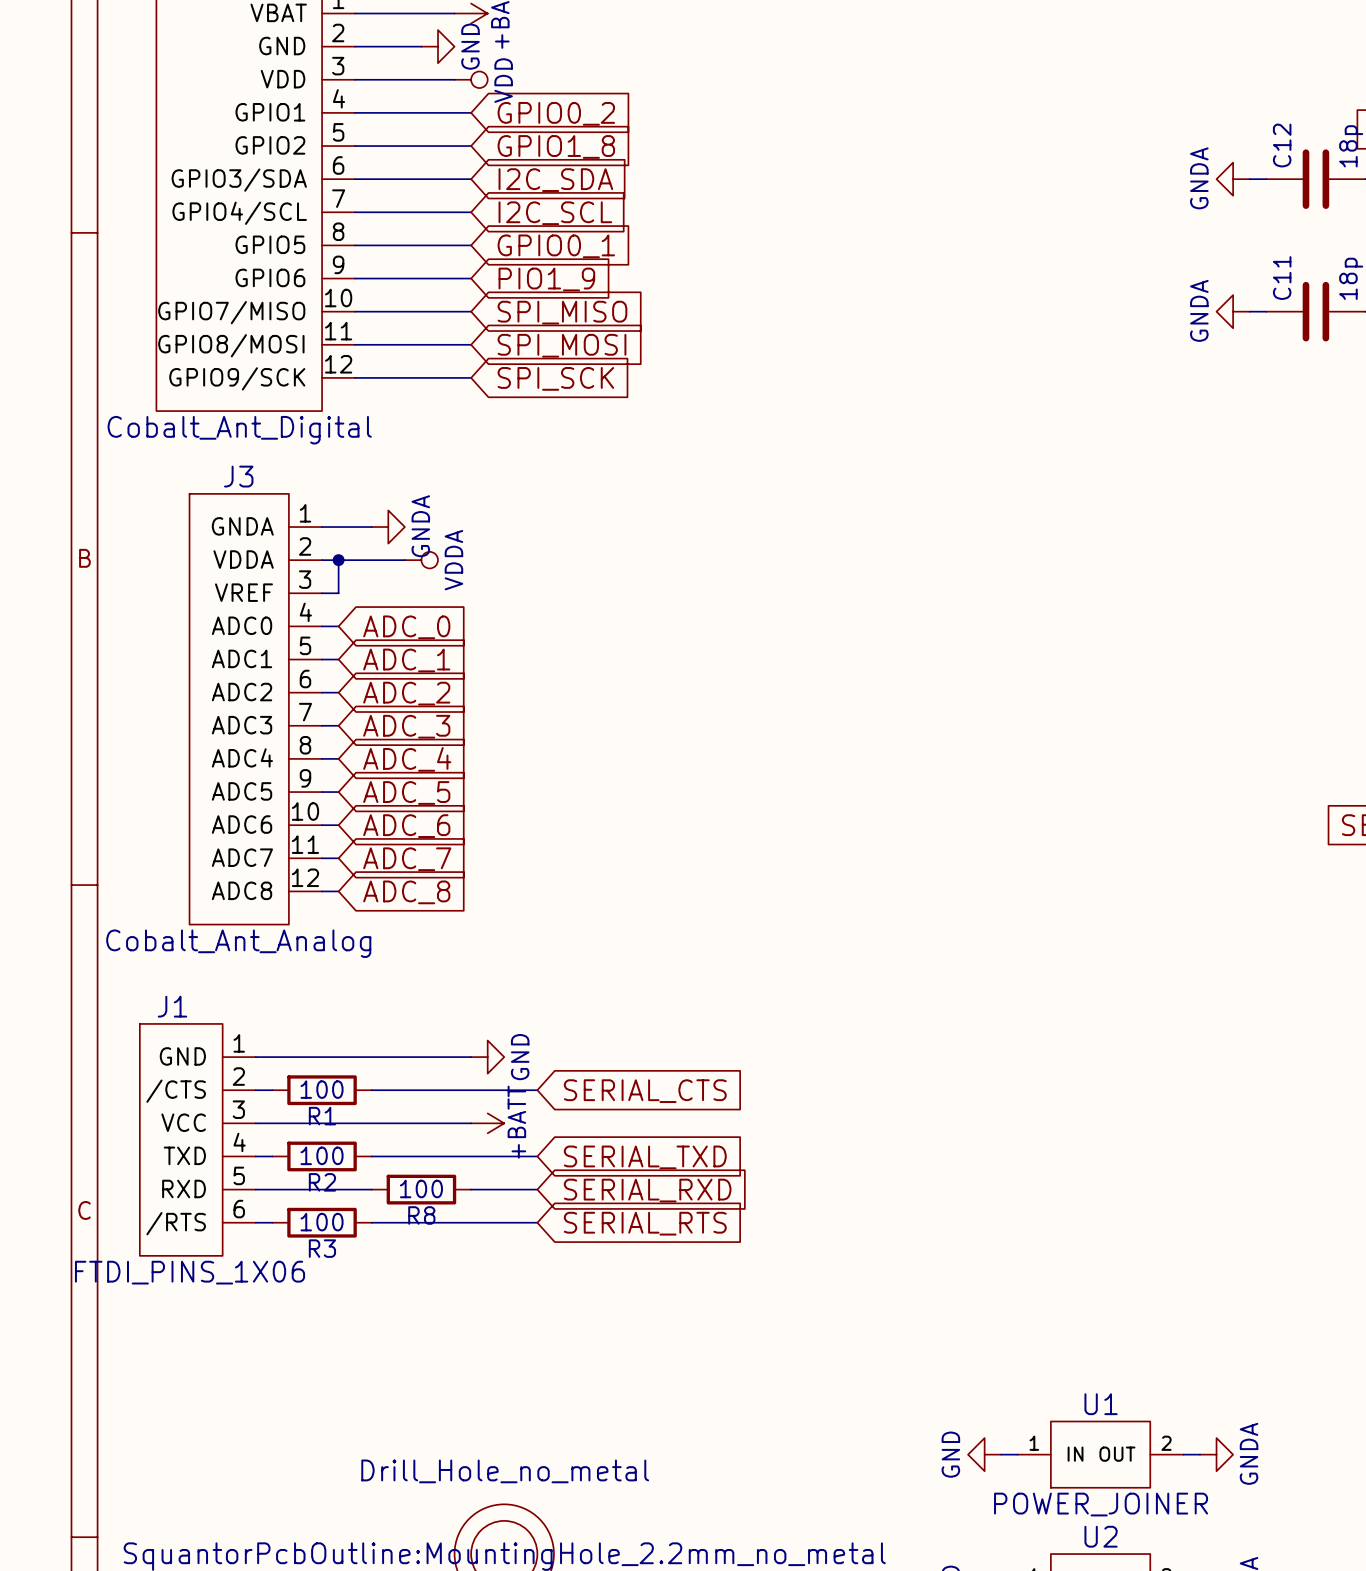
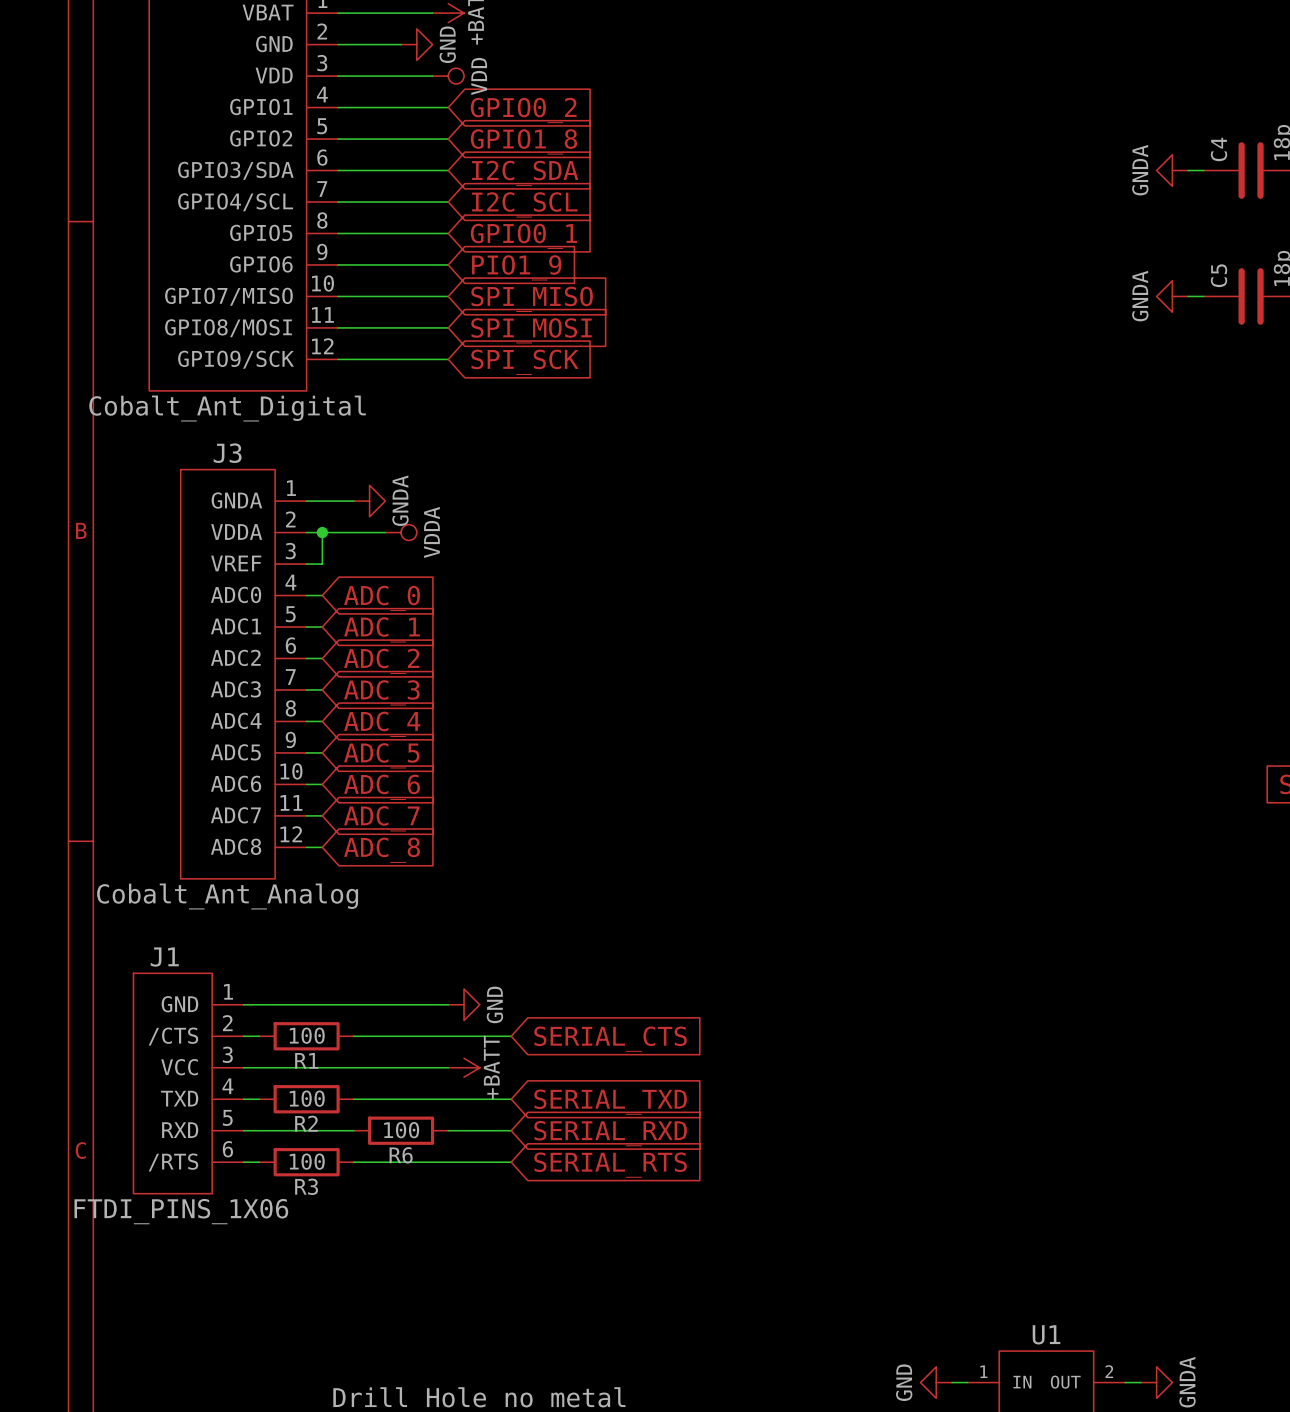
C12 name: C12 (1282, 145) -> C4 (1219, 149)
C11 name: C11 (1282, 278) -> C5 (1219, 275)
R8 name: R8 (421, 1215) -> R6 (401, 1155)

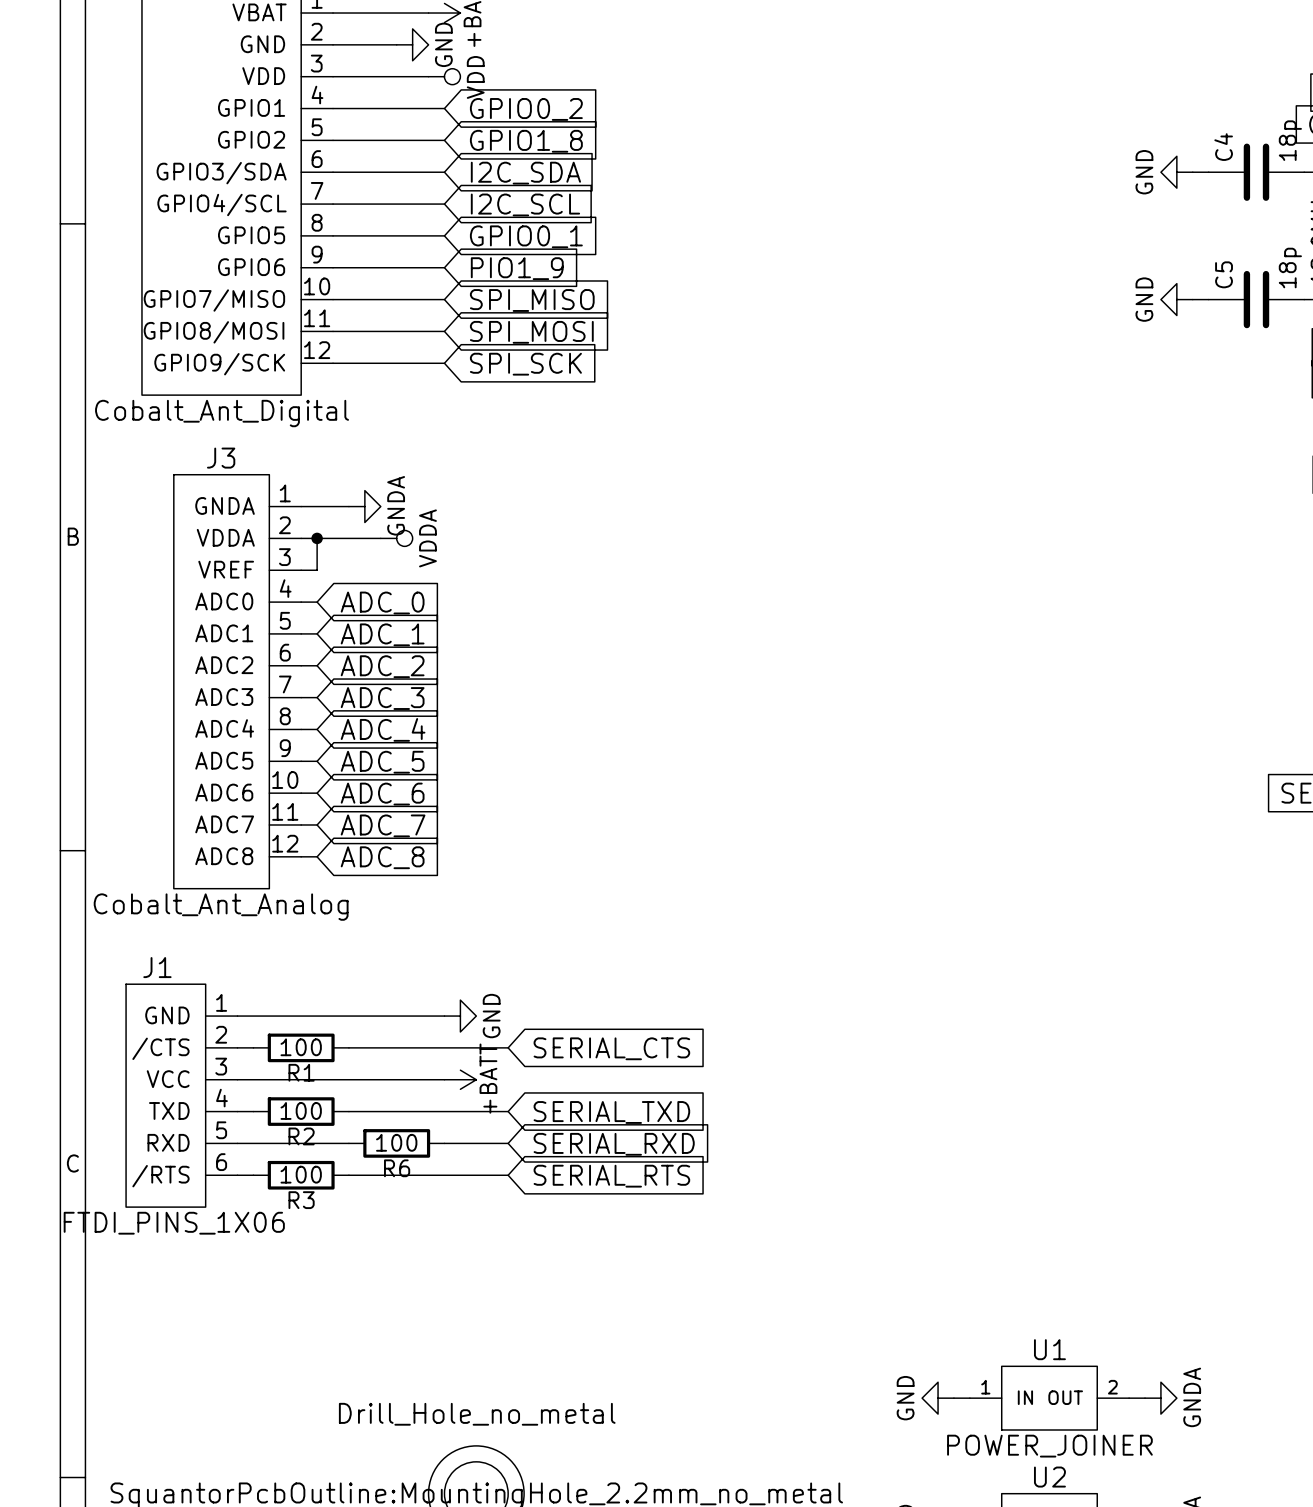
power symbol: GNDA (1172, 170) -> GND (1176, 172)
power symbol: GNDA (1172, 296) -> GND (1176, 299)

